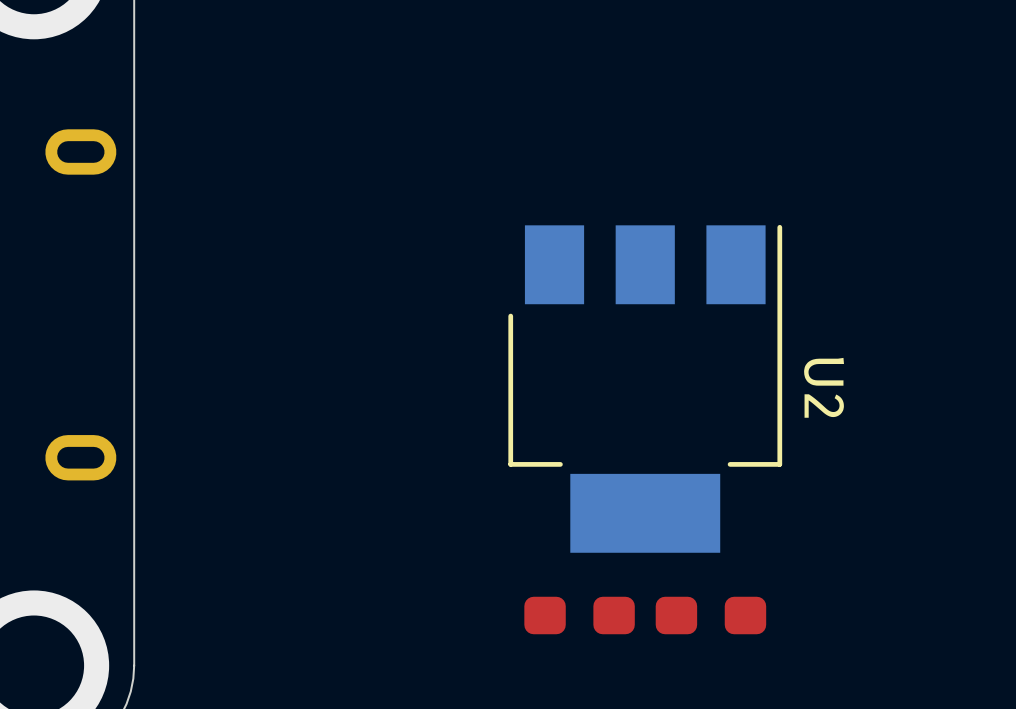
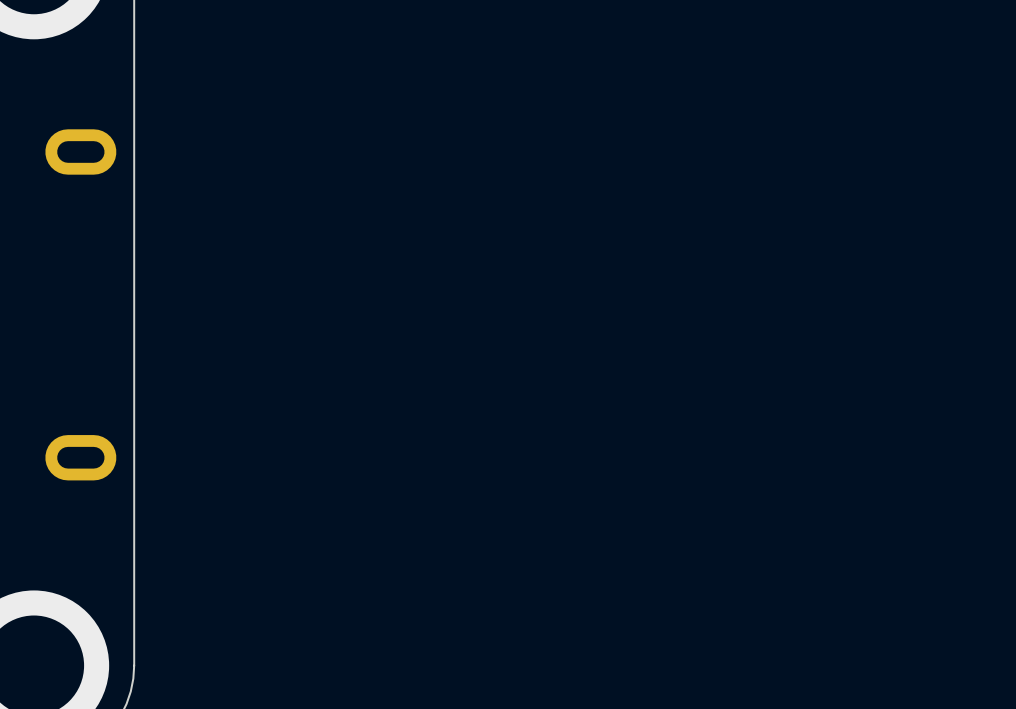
U2: (645, 388) -> none
part: (579, 615) -> none
part: (710, 615) -> none

